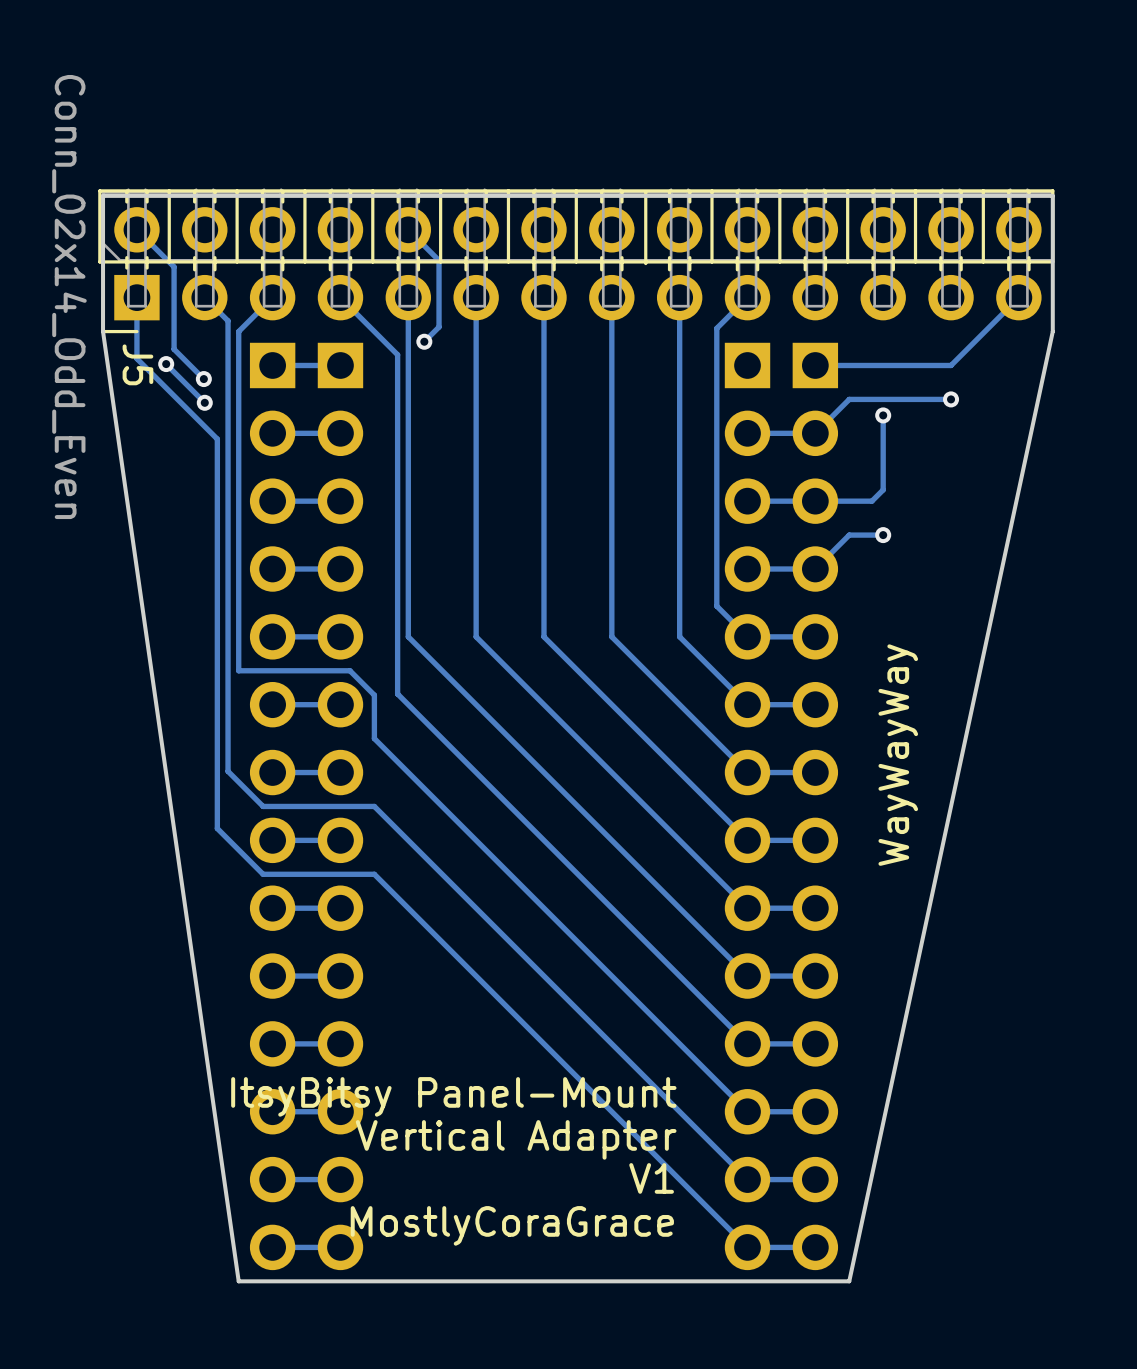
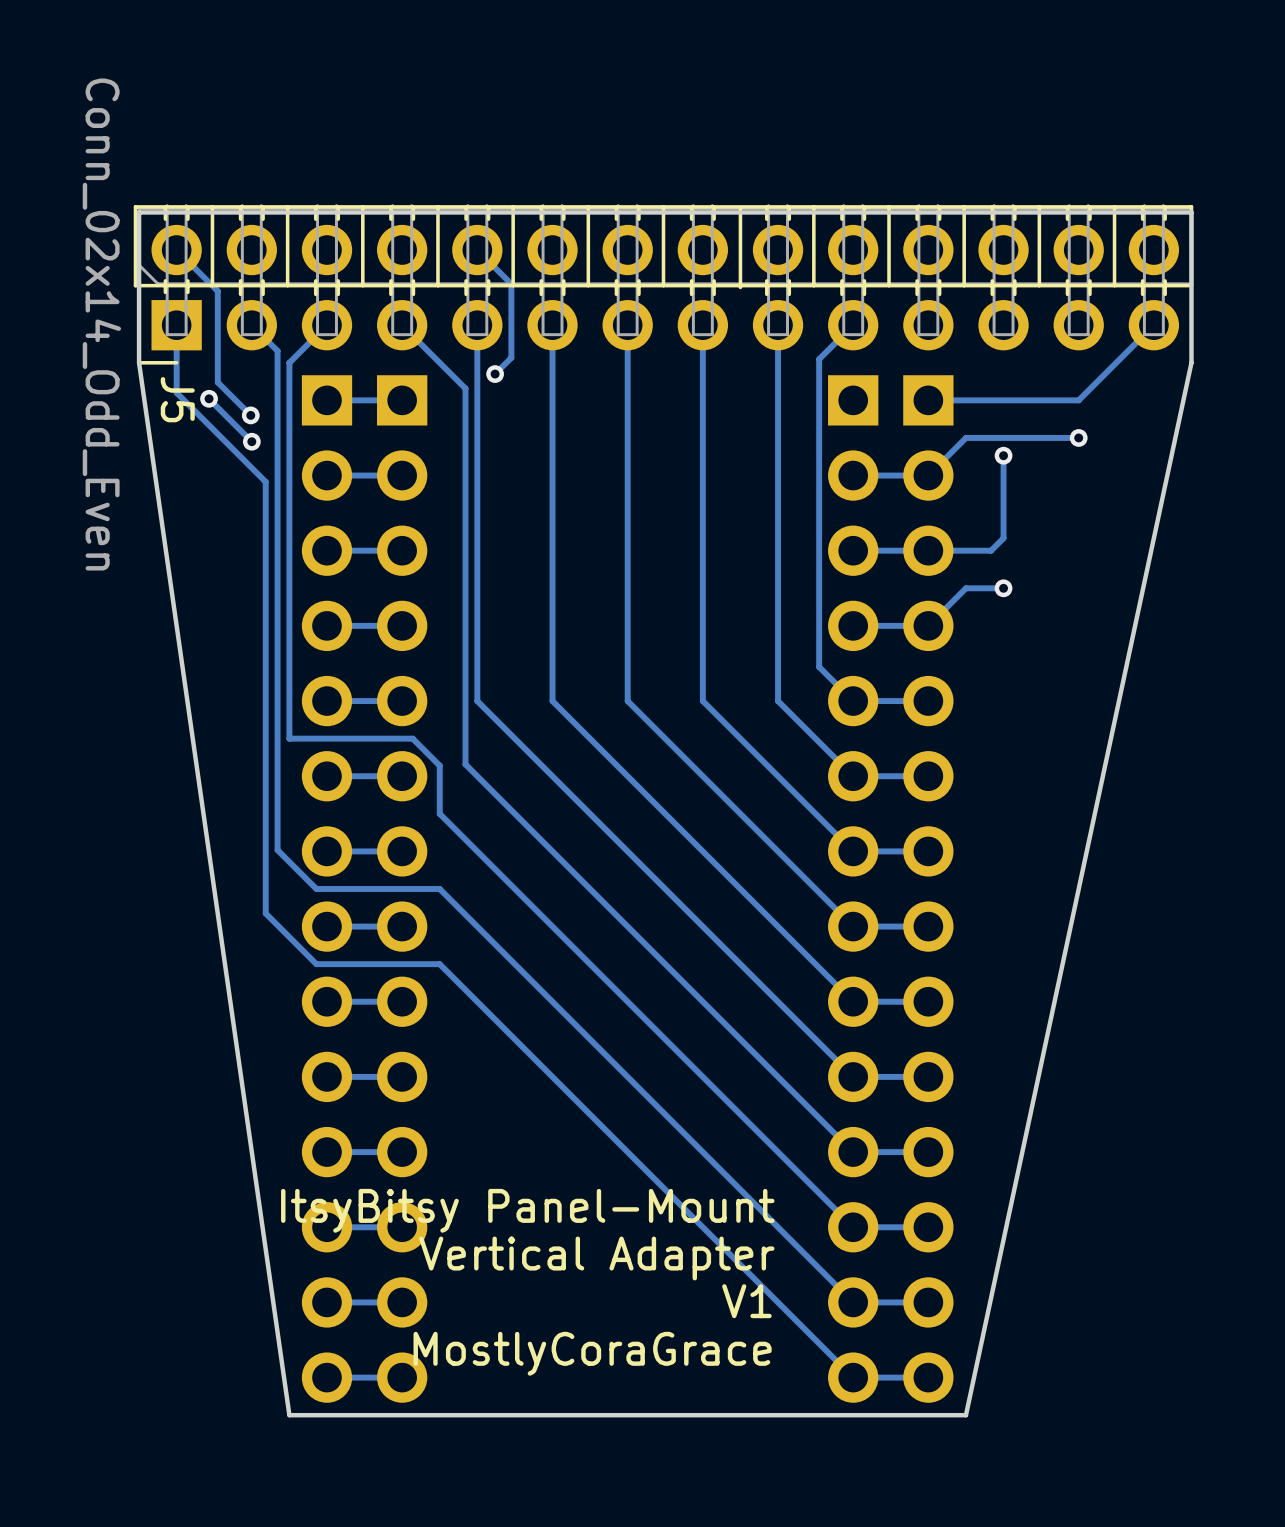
text: WayWayWay (898, 755) -> none

